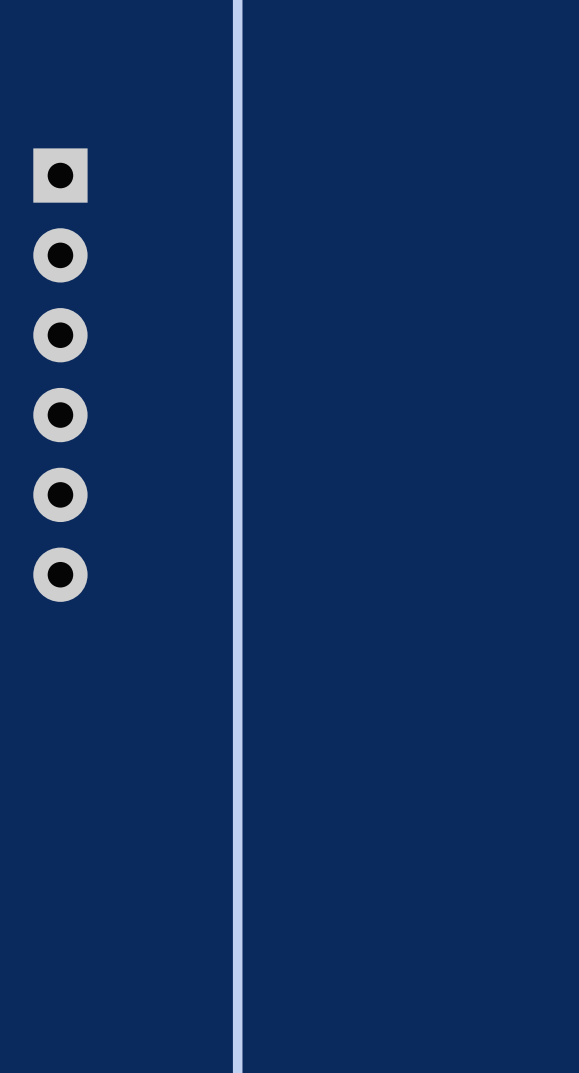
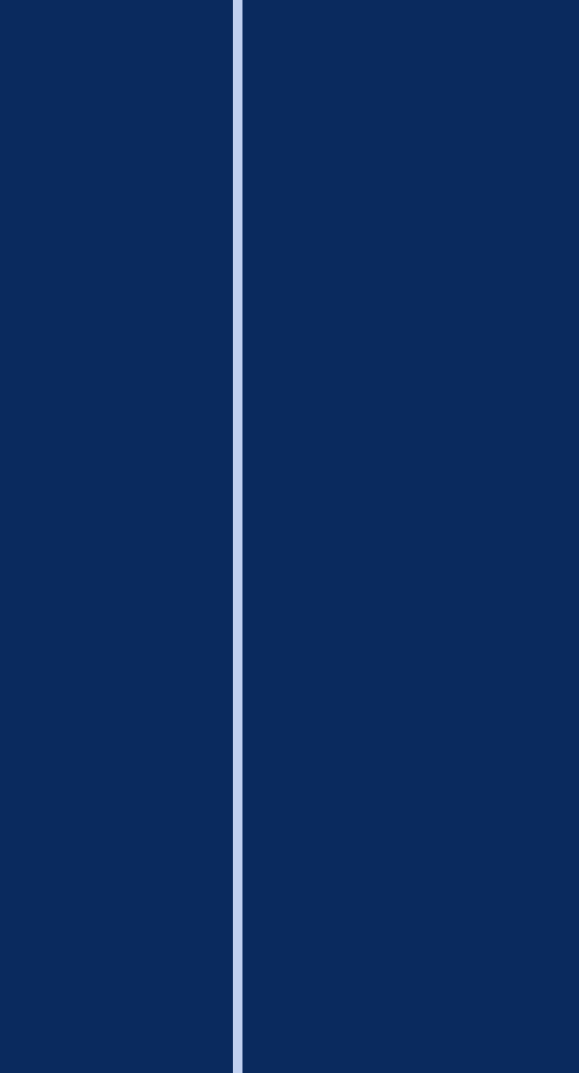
part: (60, 375) -> none

